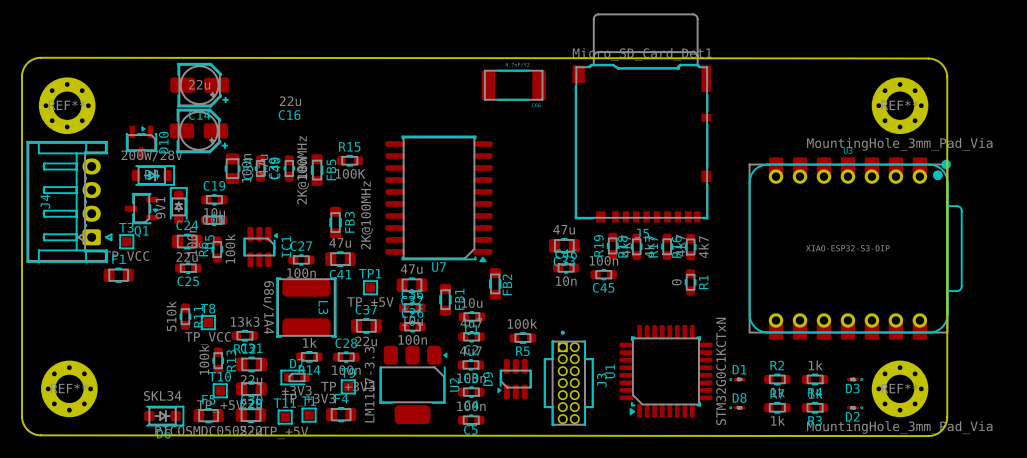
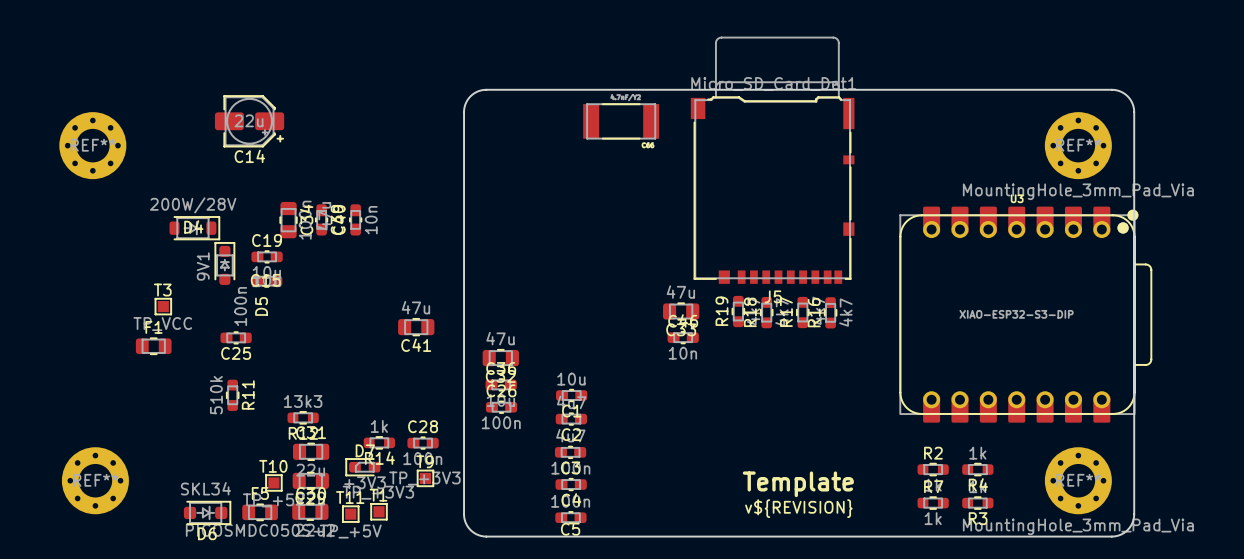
board edge: (928, 58) (40, 57) (27, 63) (21, 76) (21, 416) (24, 426) (34, 434) (928, 436) -> (1111, 89) (486, 89) (476, 92) (470, 96) (465, 104) (464, 112) (464, 514) (467, 526) (474, 533) (486, 536) (1111, 536)
C16: 22u (198, 130) -> none
D10: (141, 142) -> none
R15: 100K (349, 160) -> none
FB5: 2K@100MHz (317, 170) -> none
U7: (439, 199) -> none
J4: (69, 201) -> none
Q1: (141, 208) -> none
FB3: 2K@100MHz (335, 222) -> none
C24: 22u (187, 241) -> none
IC1: (260, 247) -> none
R6: 100k (217, 249) -> none
C27: 100n (301, 259) -> none
C45: 100n (603, 274) -> none
R1: 0 (690, 282) -> none
FB2: (495, 283) -> none
TP1: TP_+5V (370, 287) -> none
FB1: (445, 299) -> none
L3: 68u/1A4 (306, 307) -> none
T8: TP_VCC (208, 322) -> none
C37: 22u (366, 325) -> none
R5: 100k (522, 338) -> none
R13: 100k (218, 360) -> none
U1: STM32G0C1KCTxN (665, 371) -> none
J3: (568, 378) -> none
D9: (514, 379) -> none
D1: (737, 379) -> none
D3: (854, 379) -> none
U2: LM1117-3.3 (413, 384) -> none
text: none -> Template (798, 484)
D8: (737, 407) -> none
D2: (854, 407) -> none
text: none -> v${REVISION} (798, 508)
F4: (341, 414) -> none

